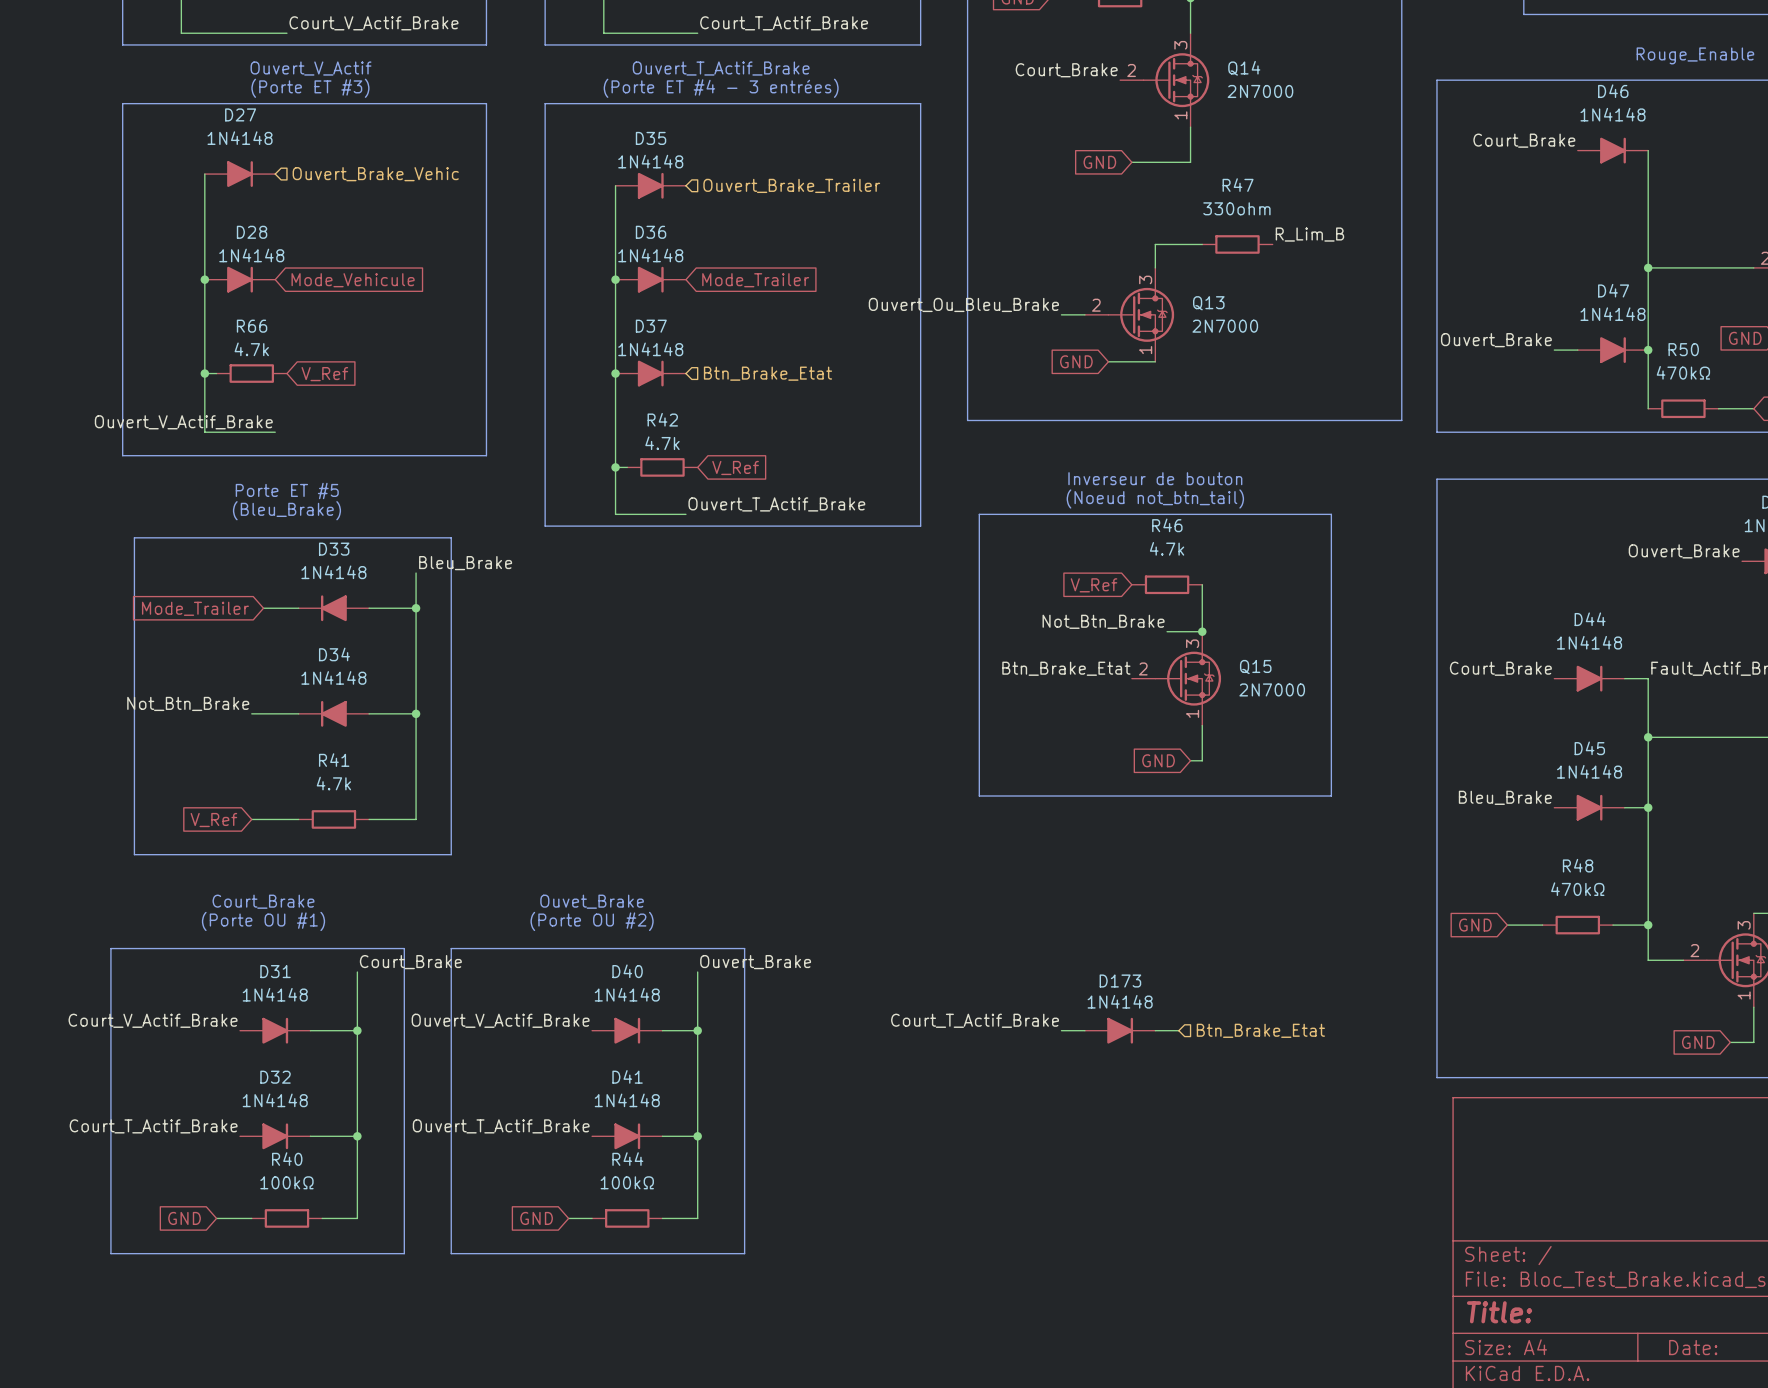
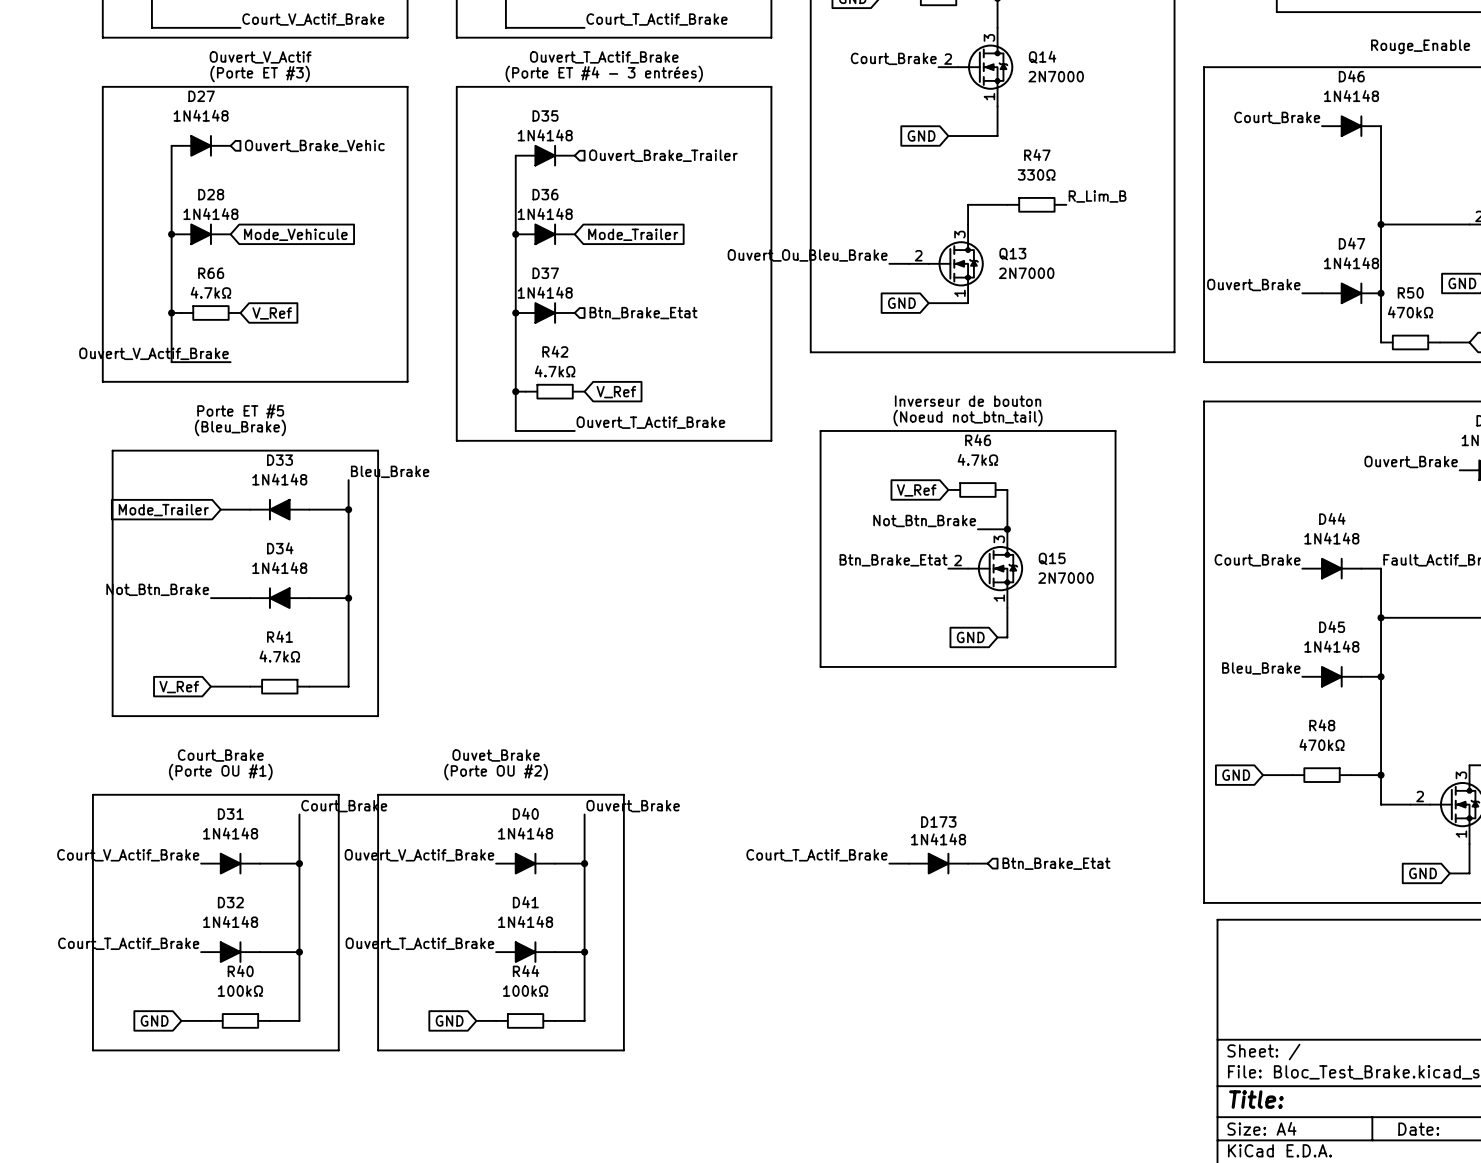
R47 value: 330ohm (1236, 208) -> 330Ω (1036, 174)
R66 value: 4.7k (251, 349) -> 4.7kΩ (210, 292)
R42 value: 4.7k (662, 443) -> 4.7kΩ (555, 371)
R46 value: 4.7k (1167, 548) -> 4.7kΩ (977, 459)
R41 value: 4.7k (333, 783) -> 4.7kΩ (279, 656)

